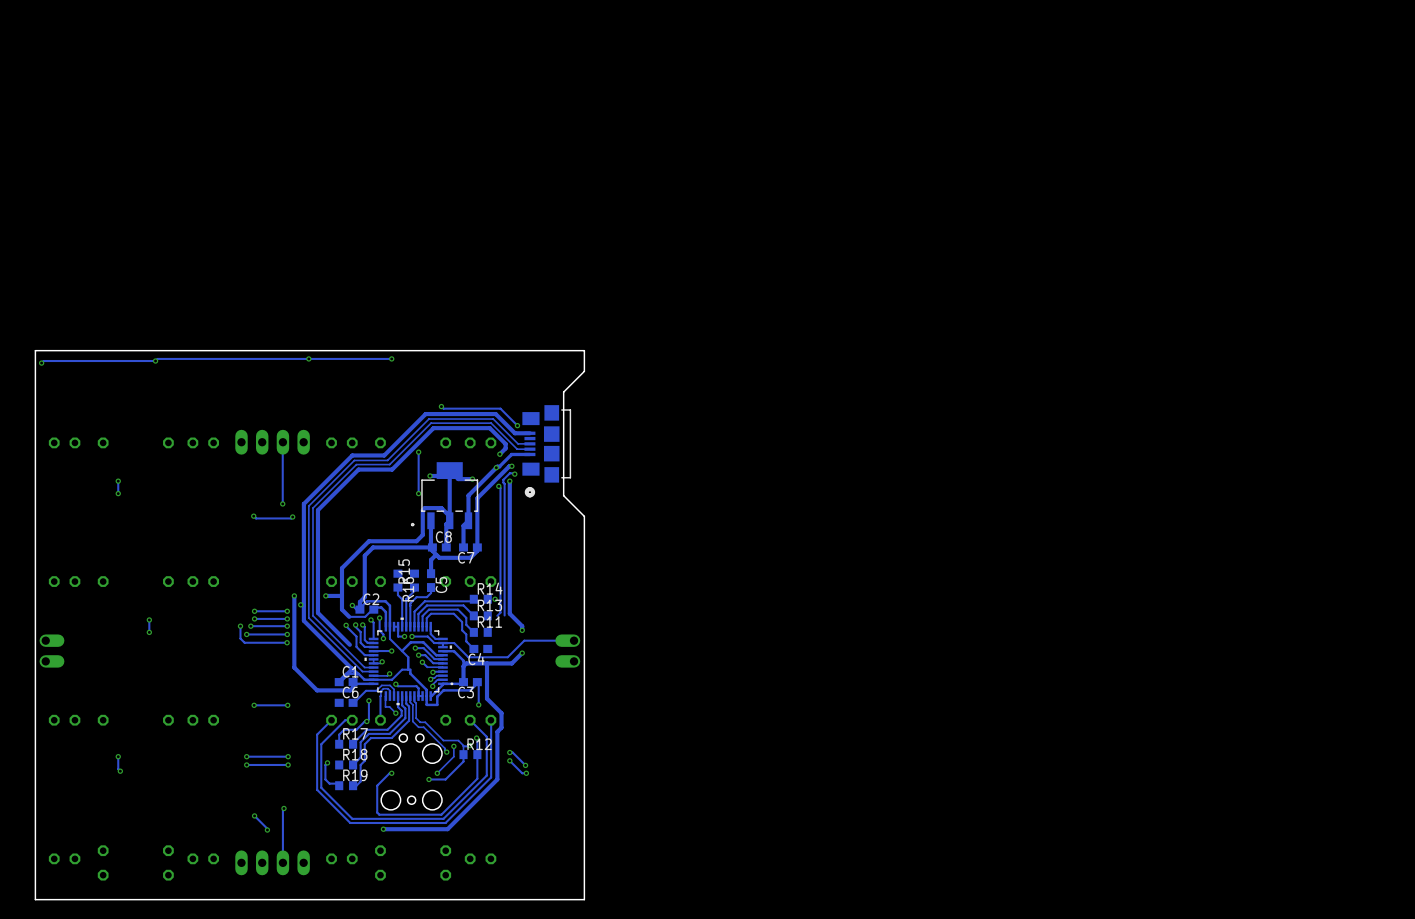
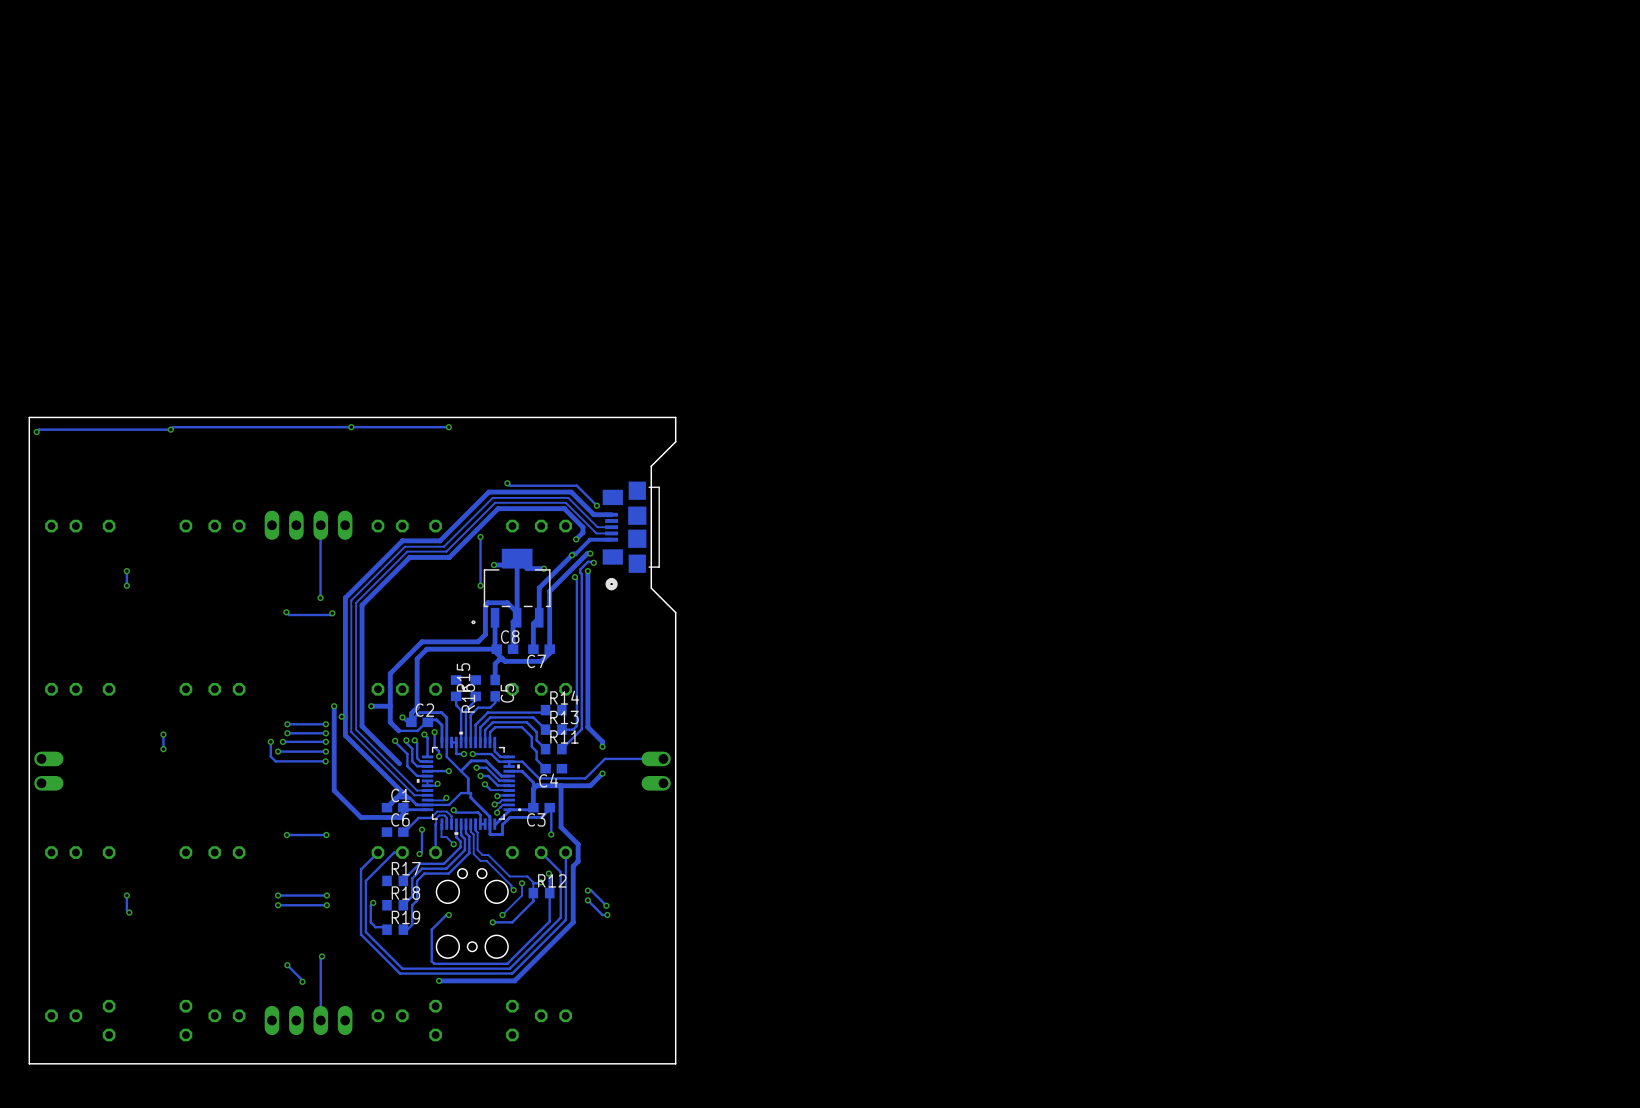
via: (495, 599) -> none
track: none -> (573, 729) (561, 729)
track: none -> (581, 729) (561, 749)
track: (366, 721) (356, 729) (344, 729) (339, 734) (339, 744) -> none

